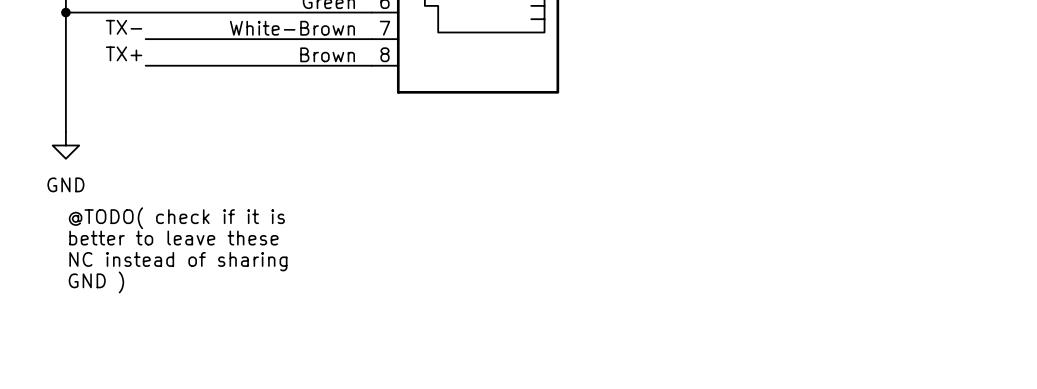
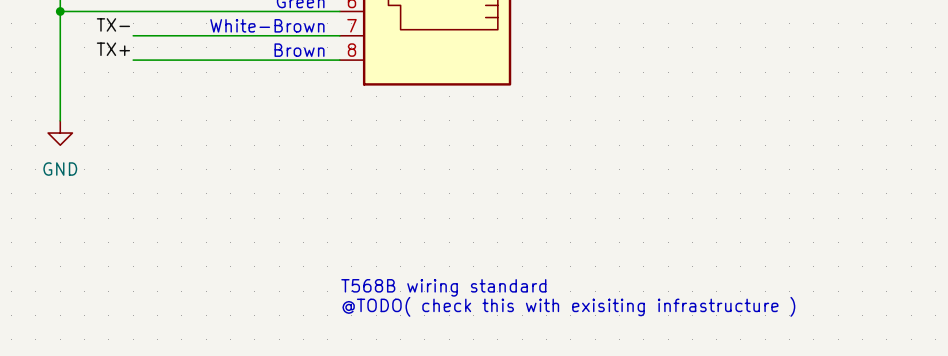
text: @TODO( check if it is (176, 218) -> none
text: better to leave these (173, 238) -> none
text: NC instead of sharing (178, 261) -> none
text: GND ) (96, 282) -> none
text: none -> T568B wiring standard (443, 287)
text: none -> @TODO( check this with exisiting infrastructure ) (568, 306)

